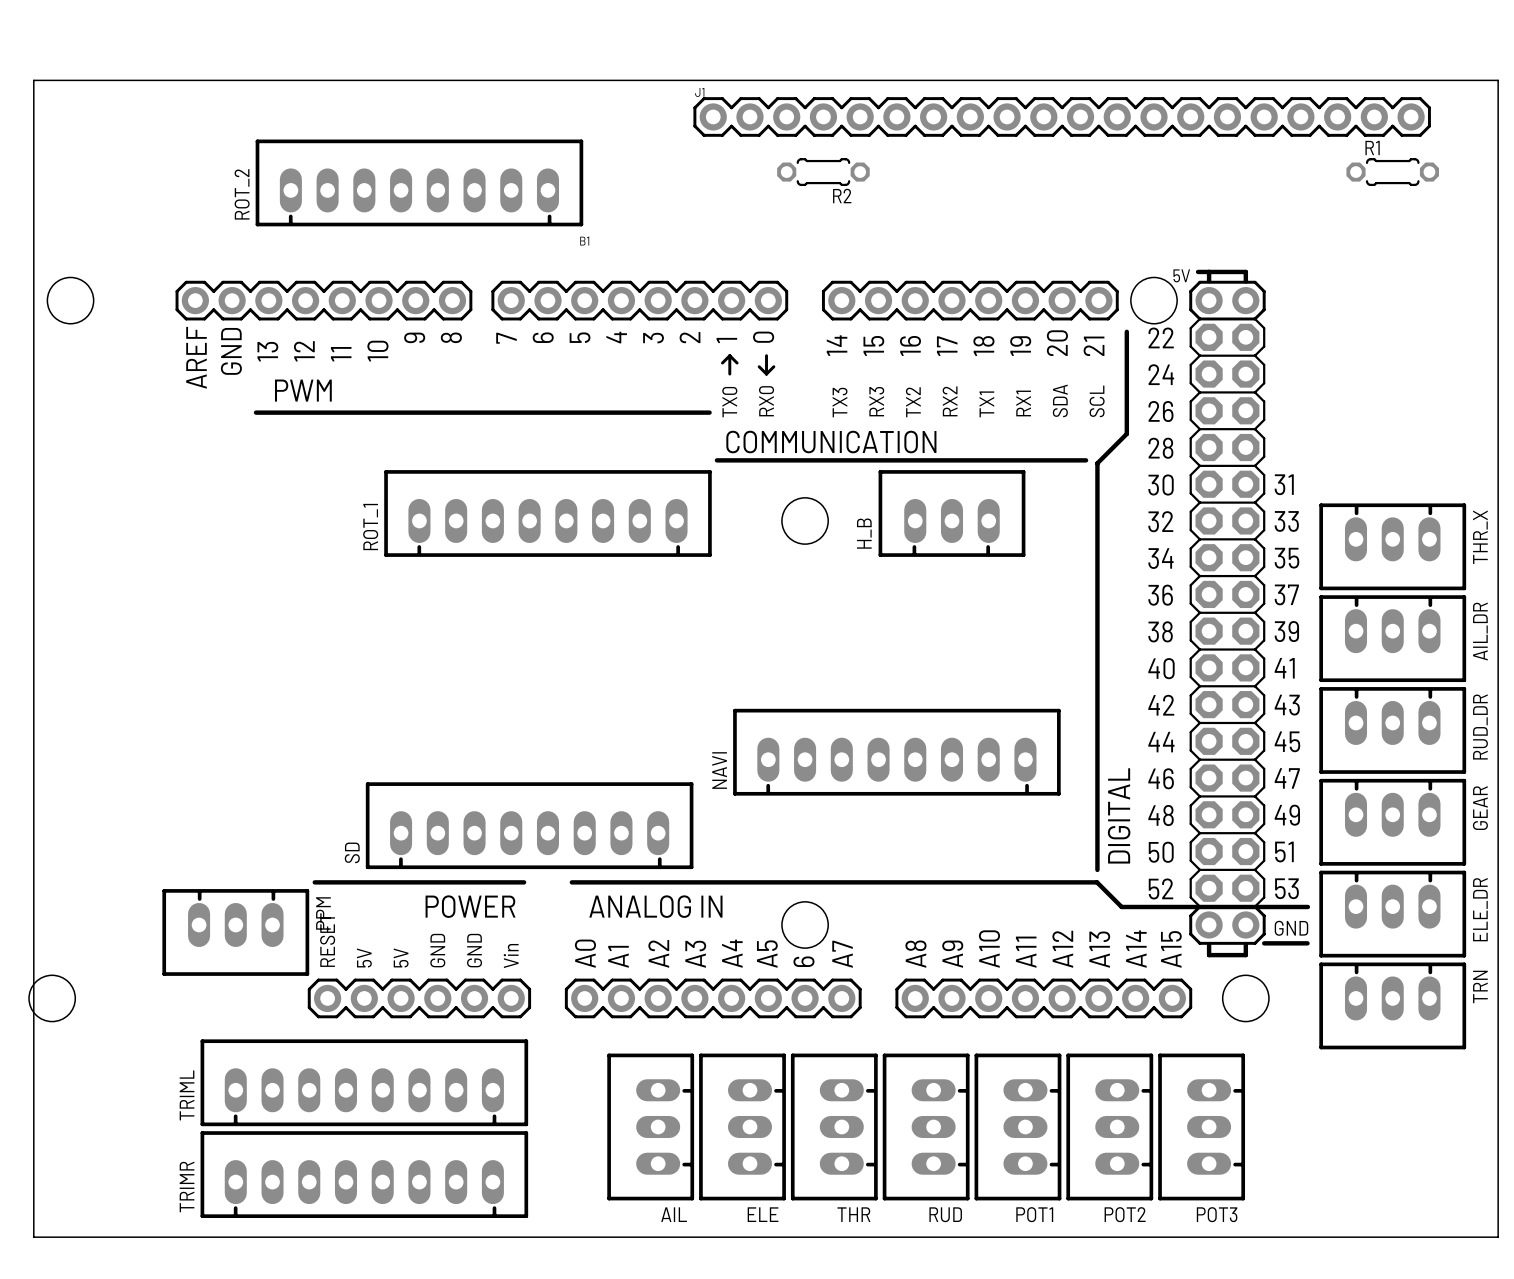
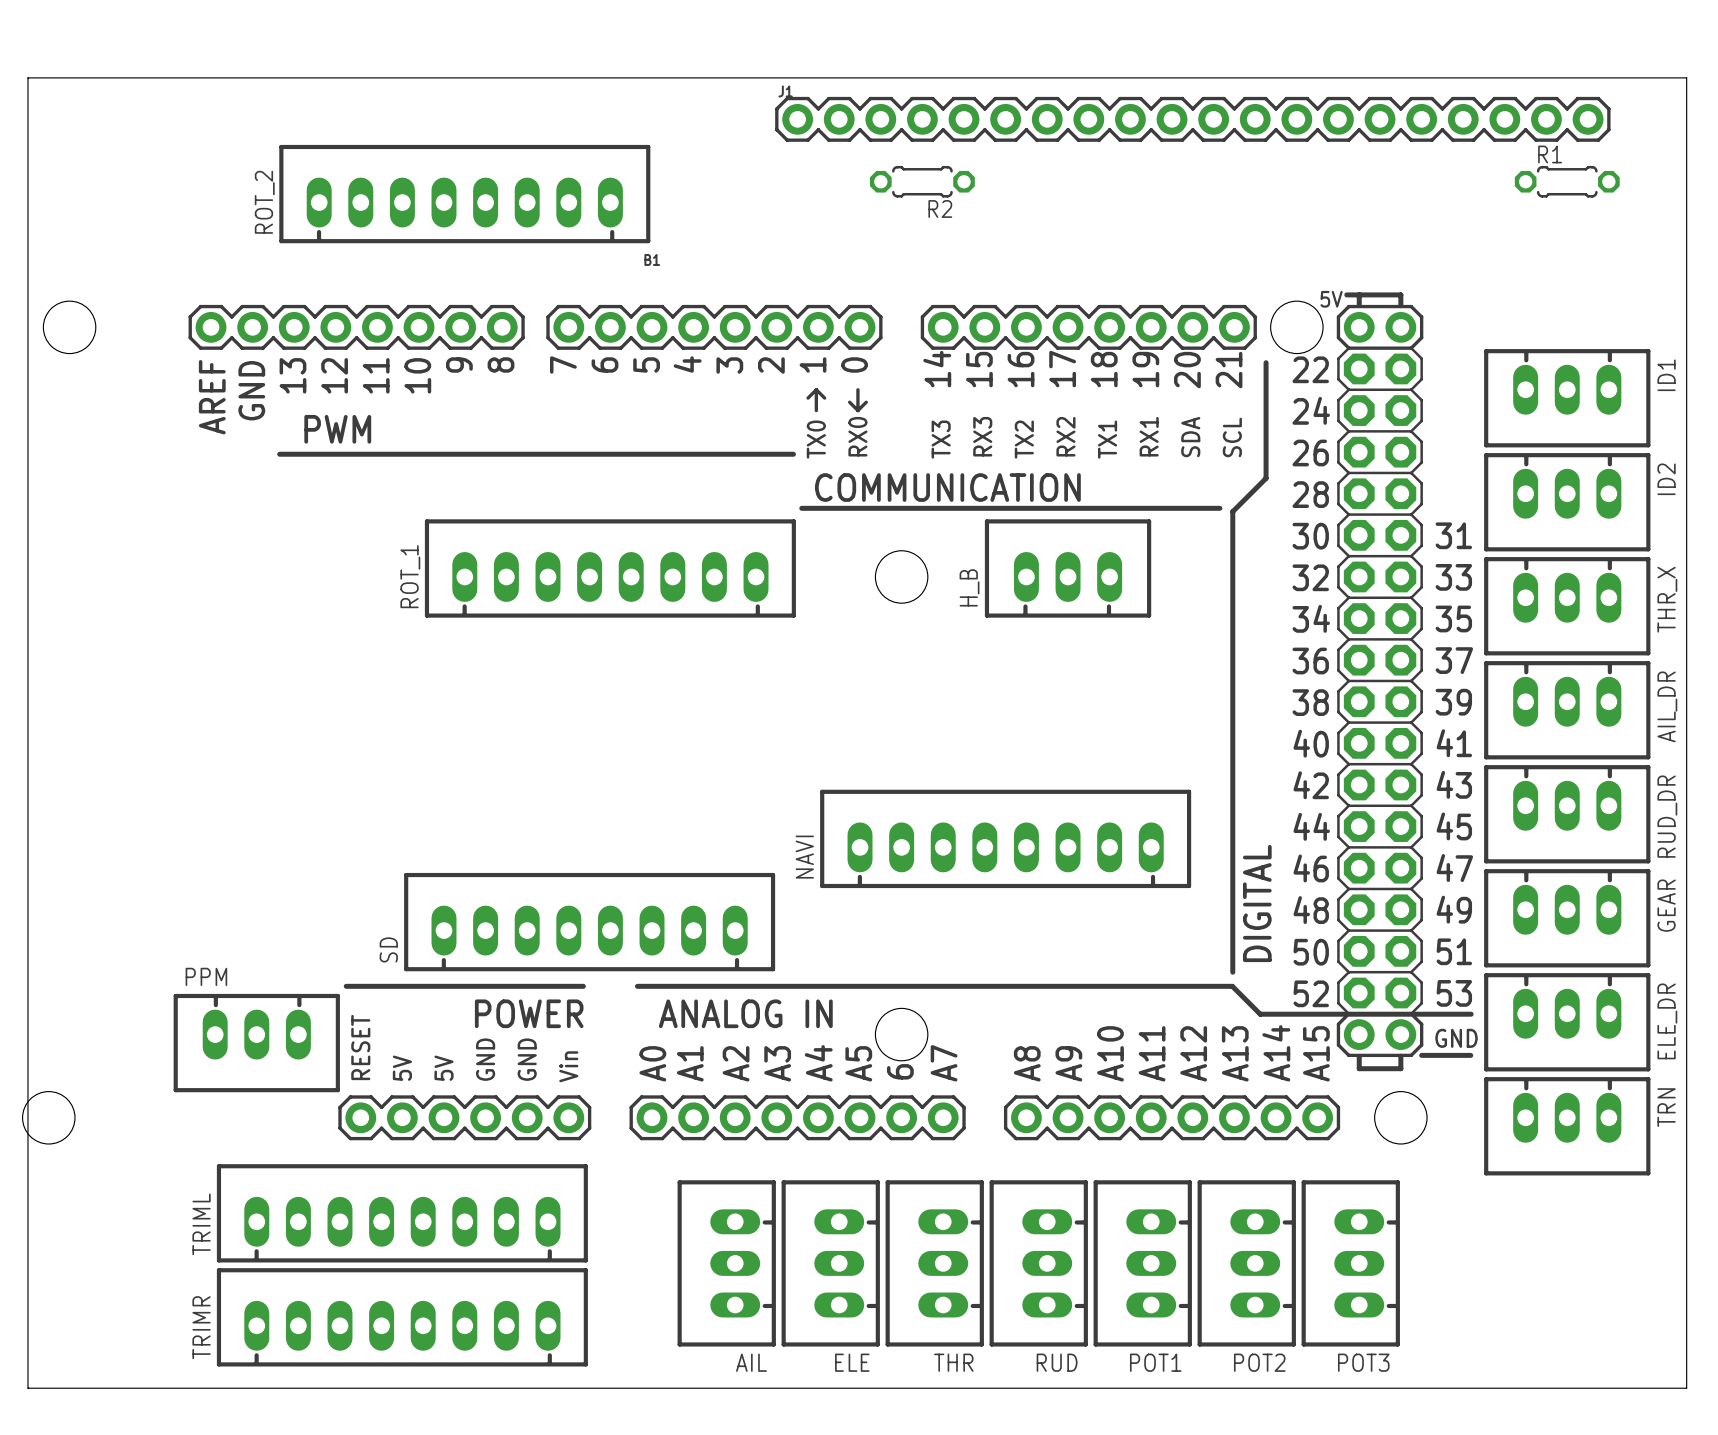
ID1: none -> (1567, 398)
ID2: none -> (1567, 502)
PPM name rotation: 0° (323, 913) -> 90° clockwise (206, 976)
PPM name position: PPM (323, 913) -> PPM (206, 976)

